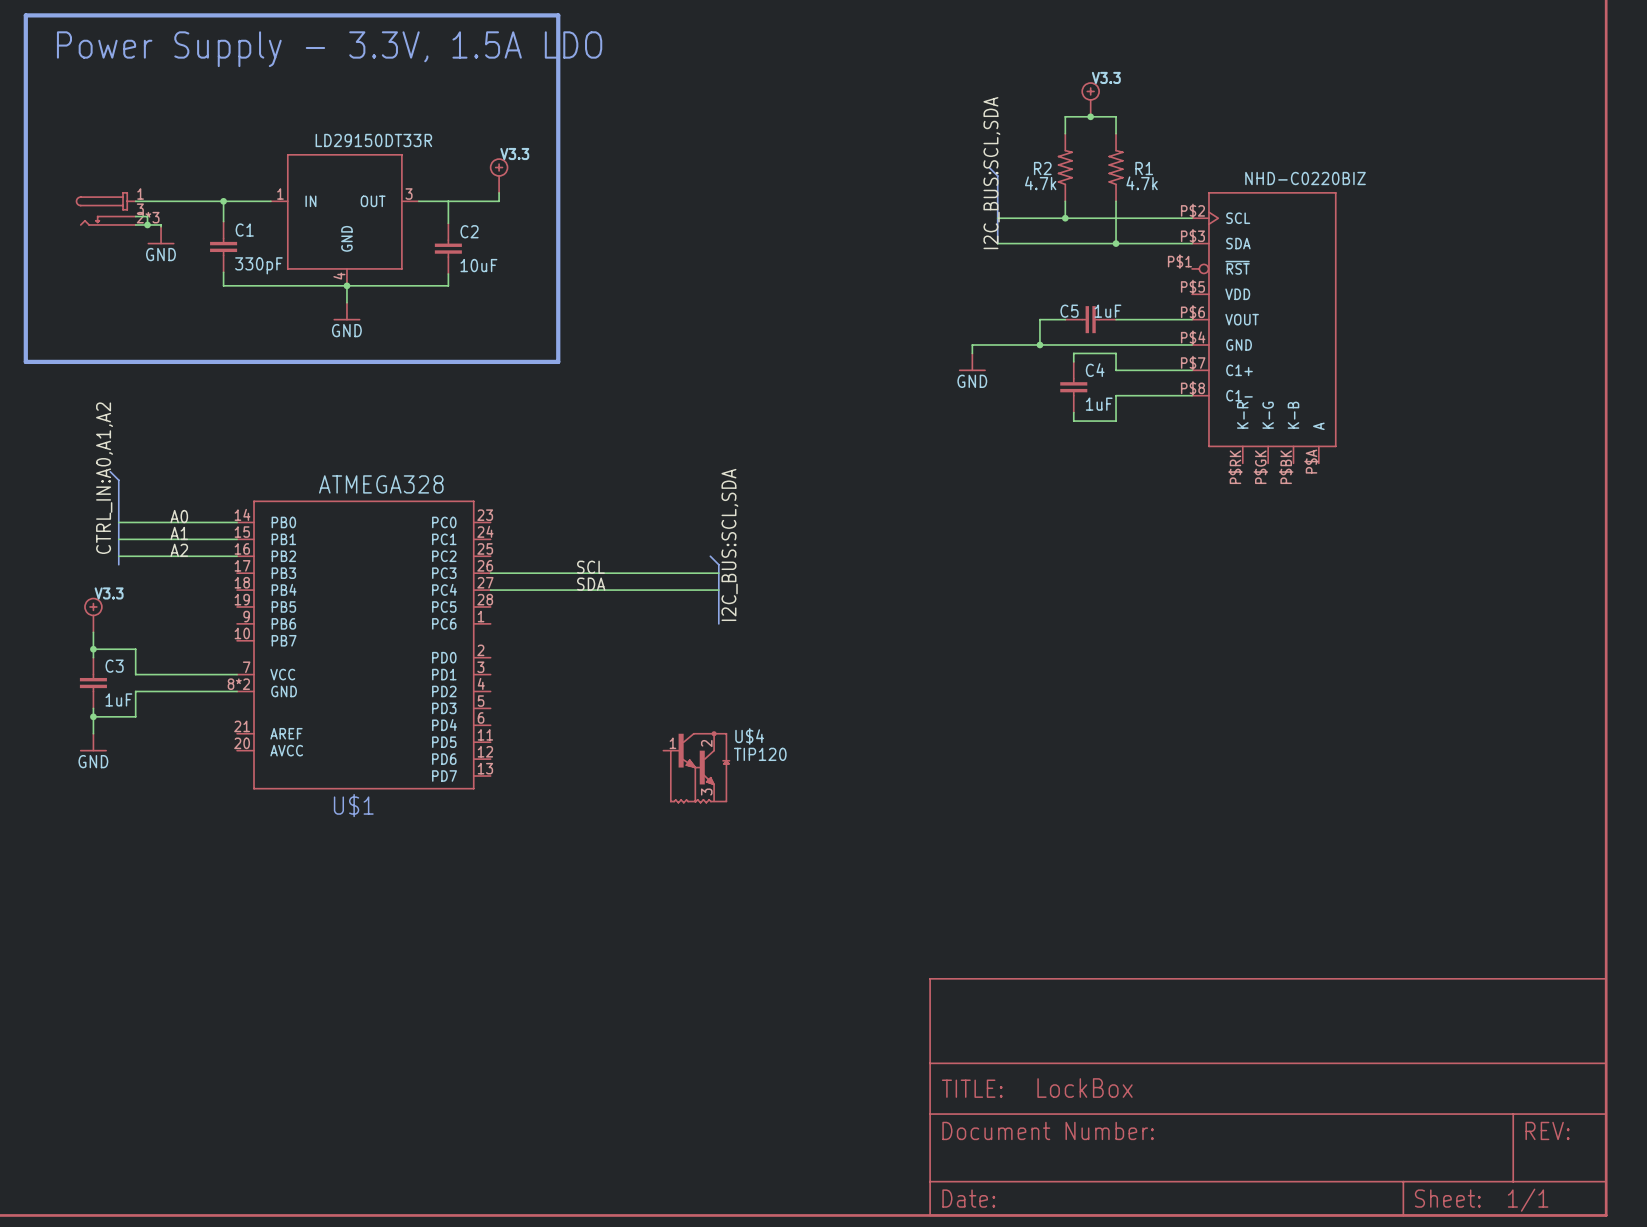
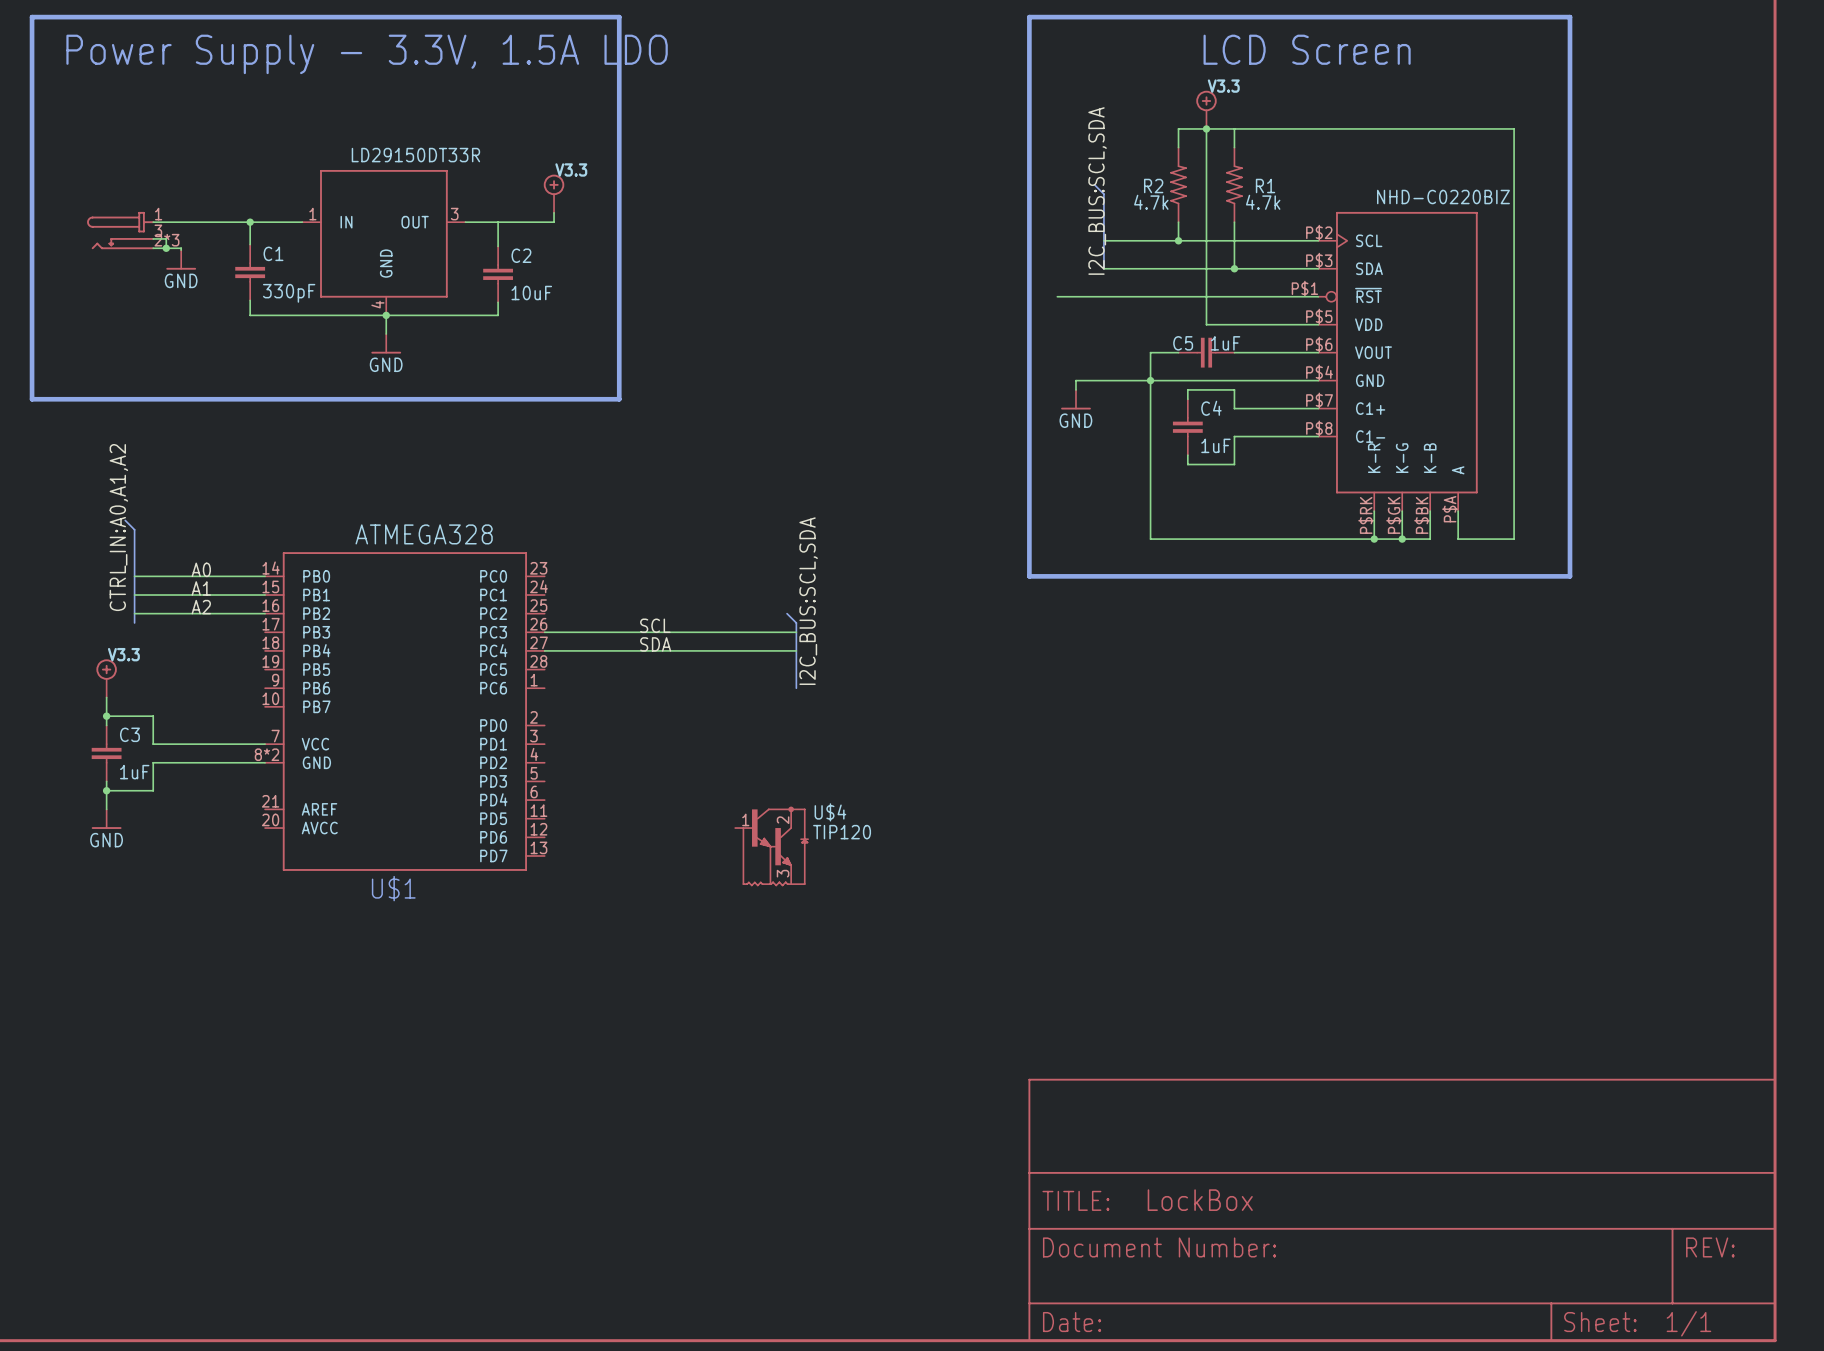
line: none -> (1029, 17) (1569, 17) (1569, 576) (1029, 576) (1029, 17)
text: none -> LCD Screen (1307, 49)
wire: none -> (1206, 128) (1206, 324) (1318, 324)
wire: none -> (1234, 128) (1514, 128) (1514, 539) (1458, 539) (1458, 511)
wire: none -> (1057, 296) (1318, 296)
wire: none -> (1150, 380) (1150, 539) (1430, 539) (1430, 511)
wire: none -> (1374, 511) (1374, 539)
wire: none -> (1402, 511) (1402, 539)
junction: none -> (1374, 539)
junction: none -> (1402, 539)

